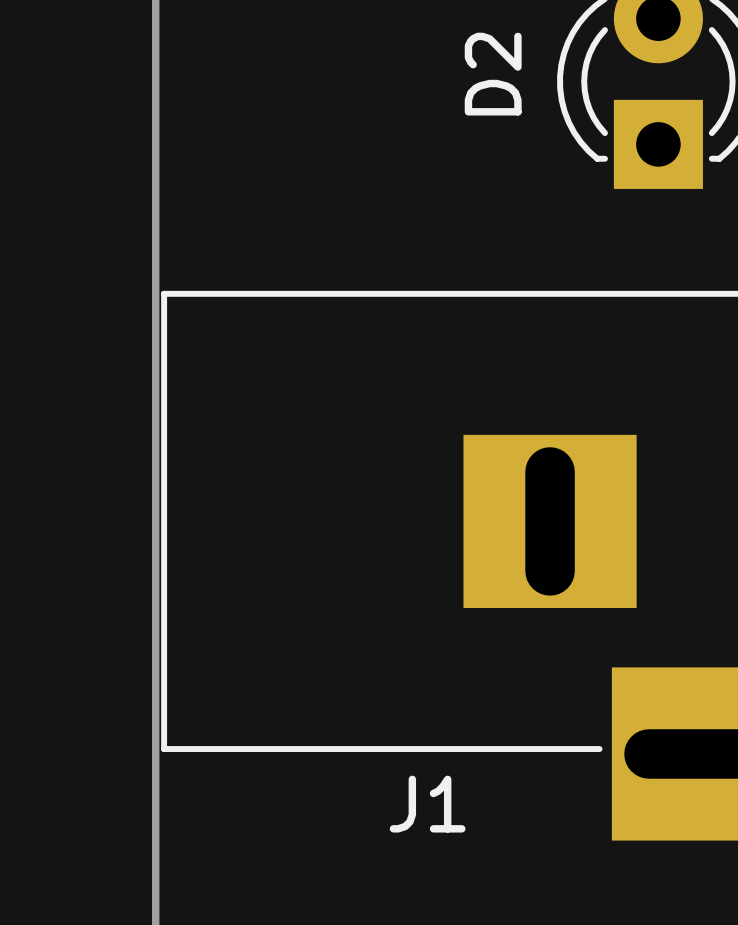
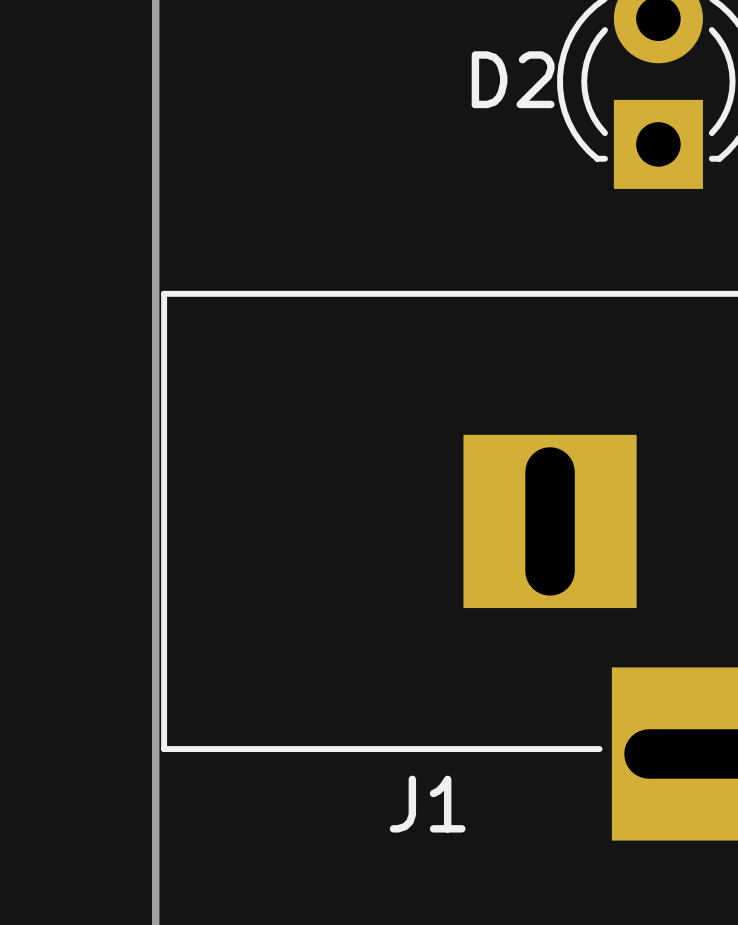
D2 name rotation: 0° (493, 74) -> 90° clockwise (513, 79)

